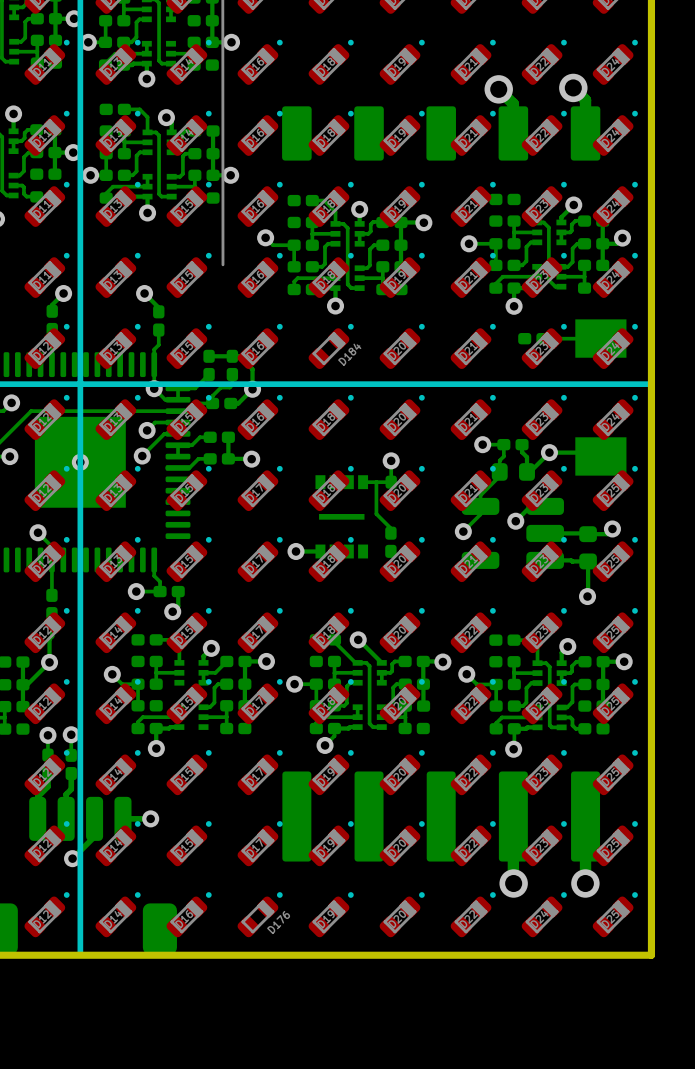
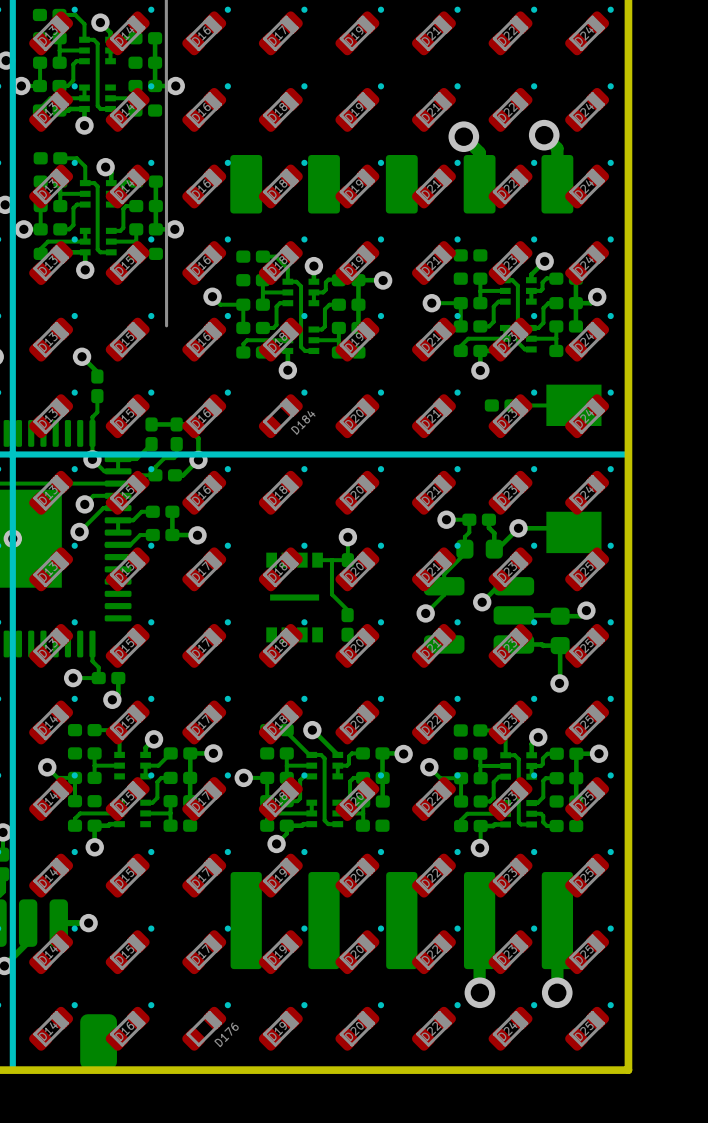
bottom track: (296, 551) (320, 551) -> none
via: (296, 551) -> none

